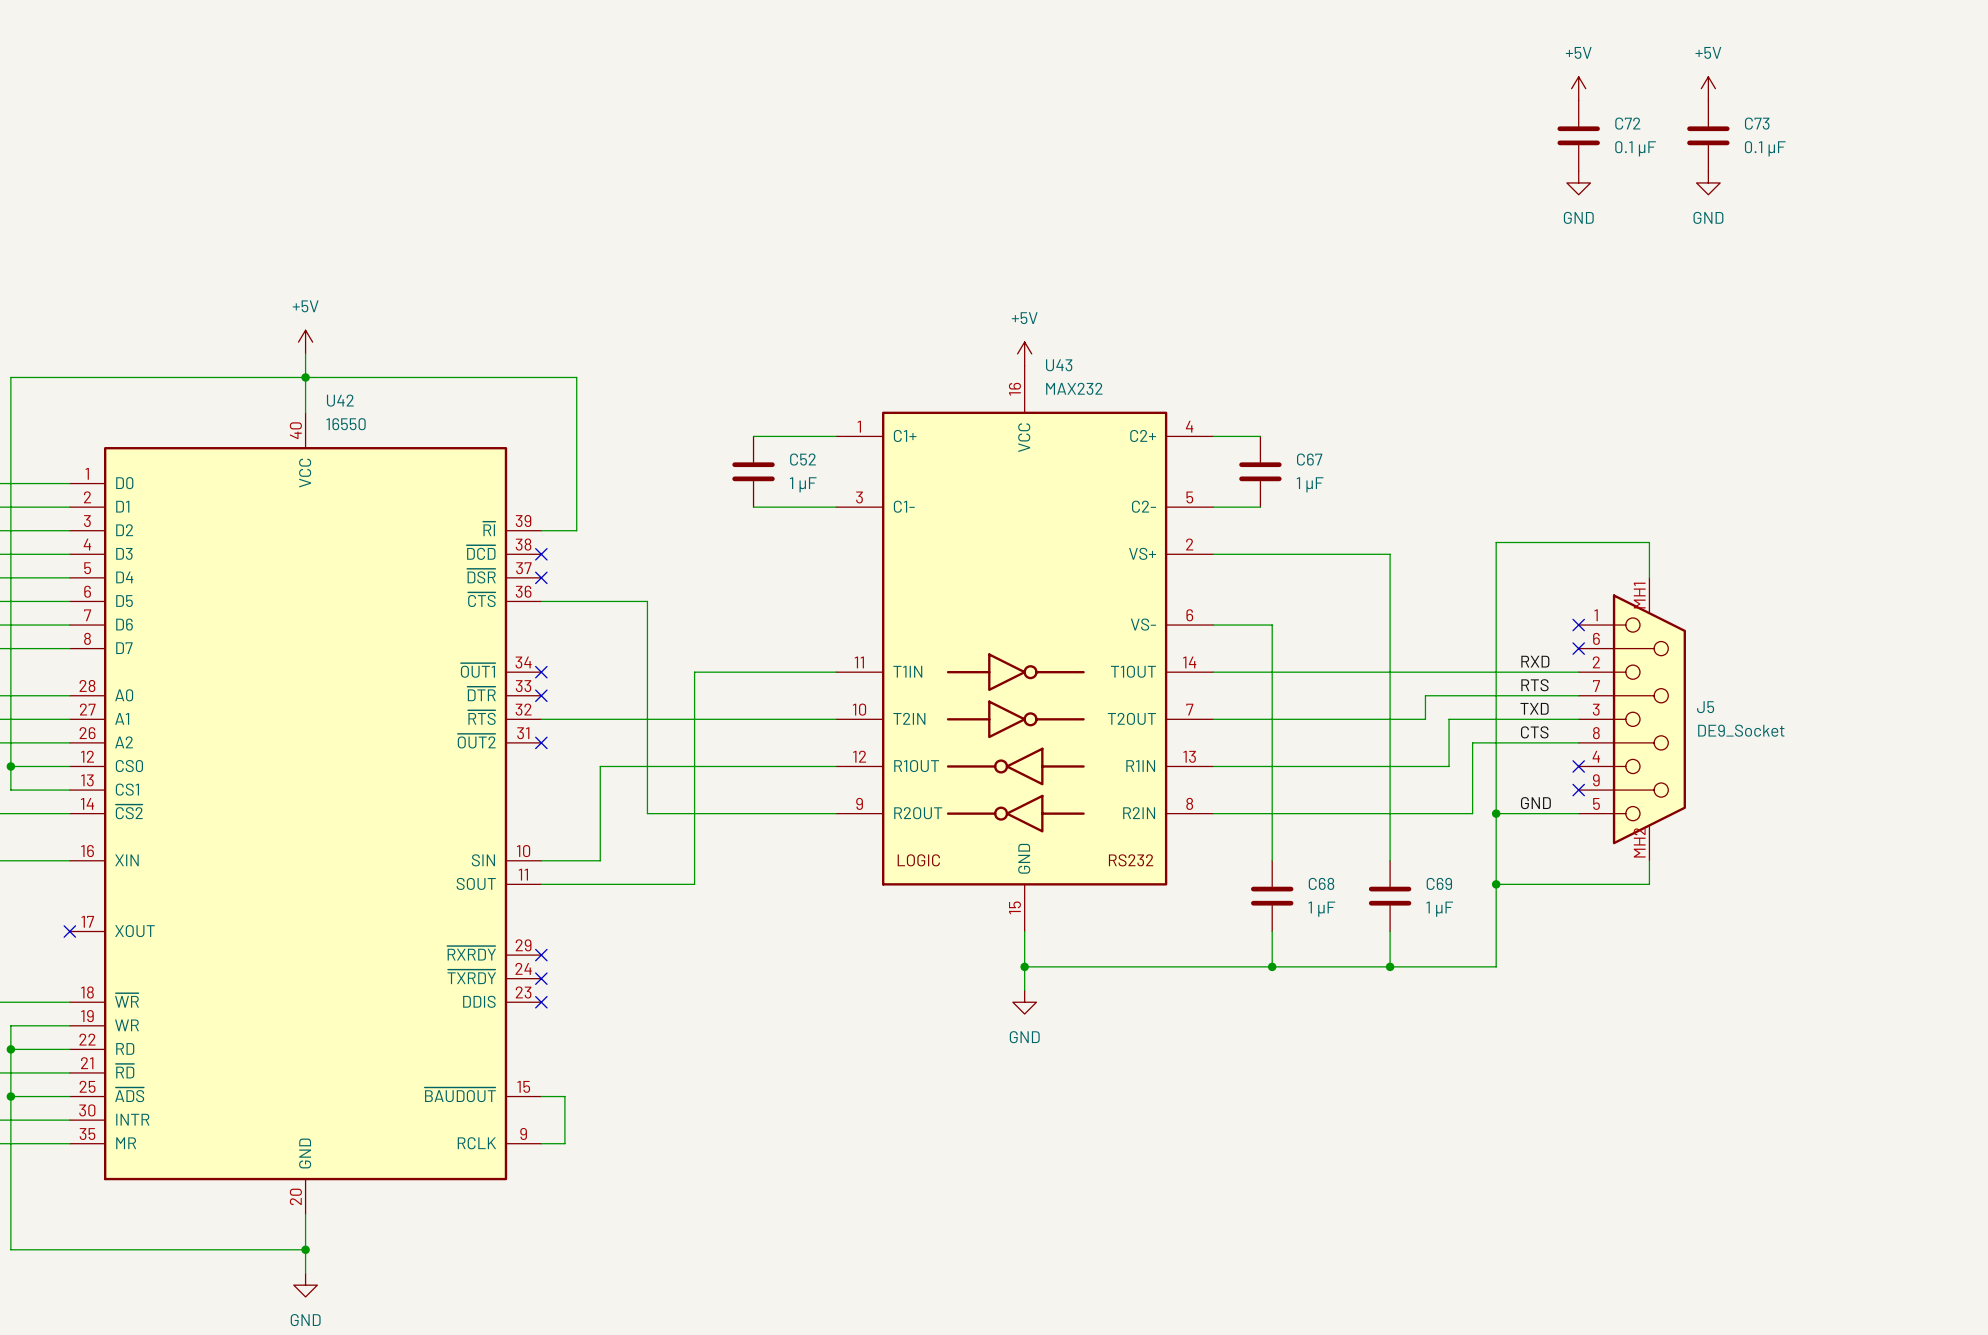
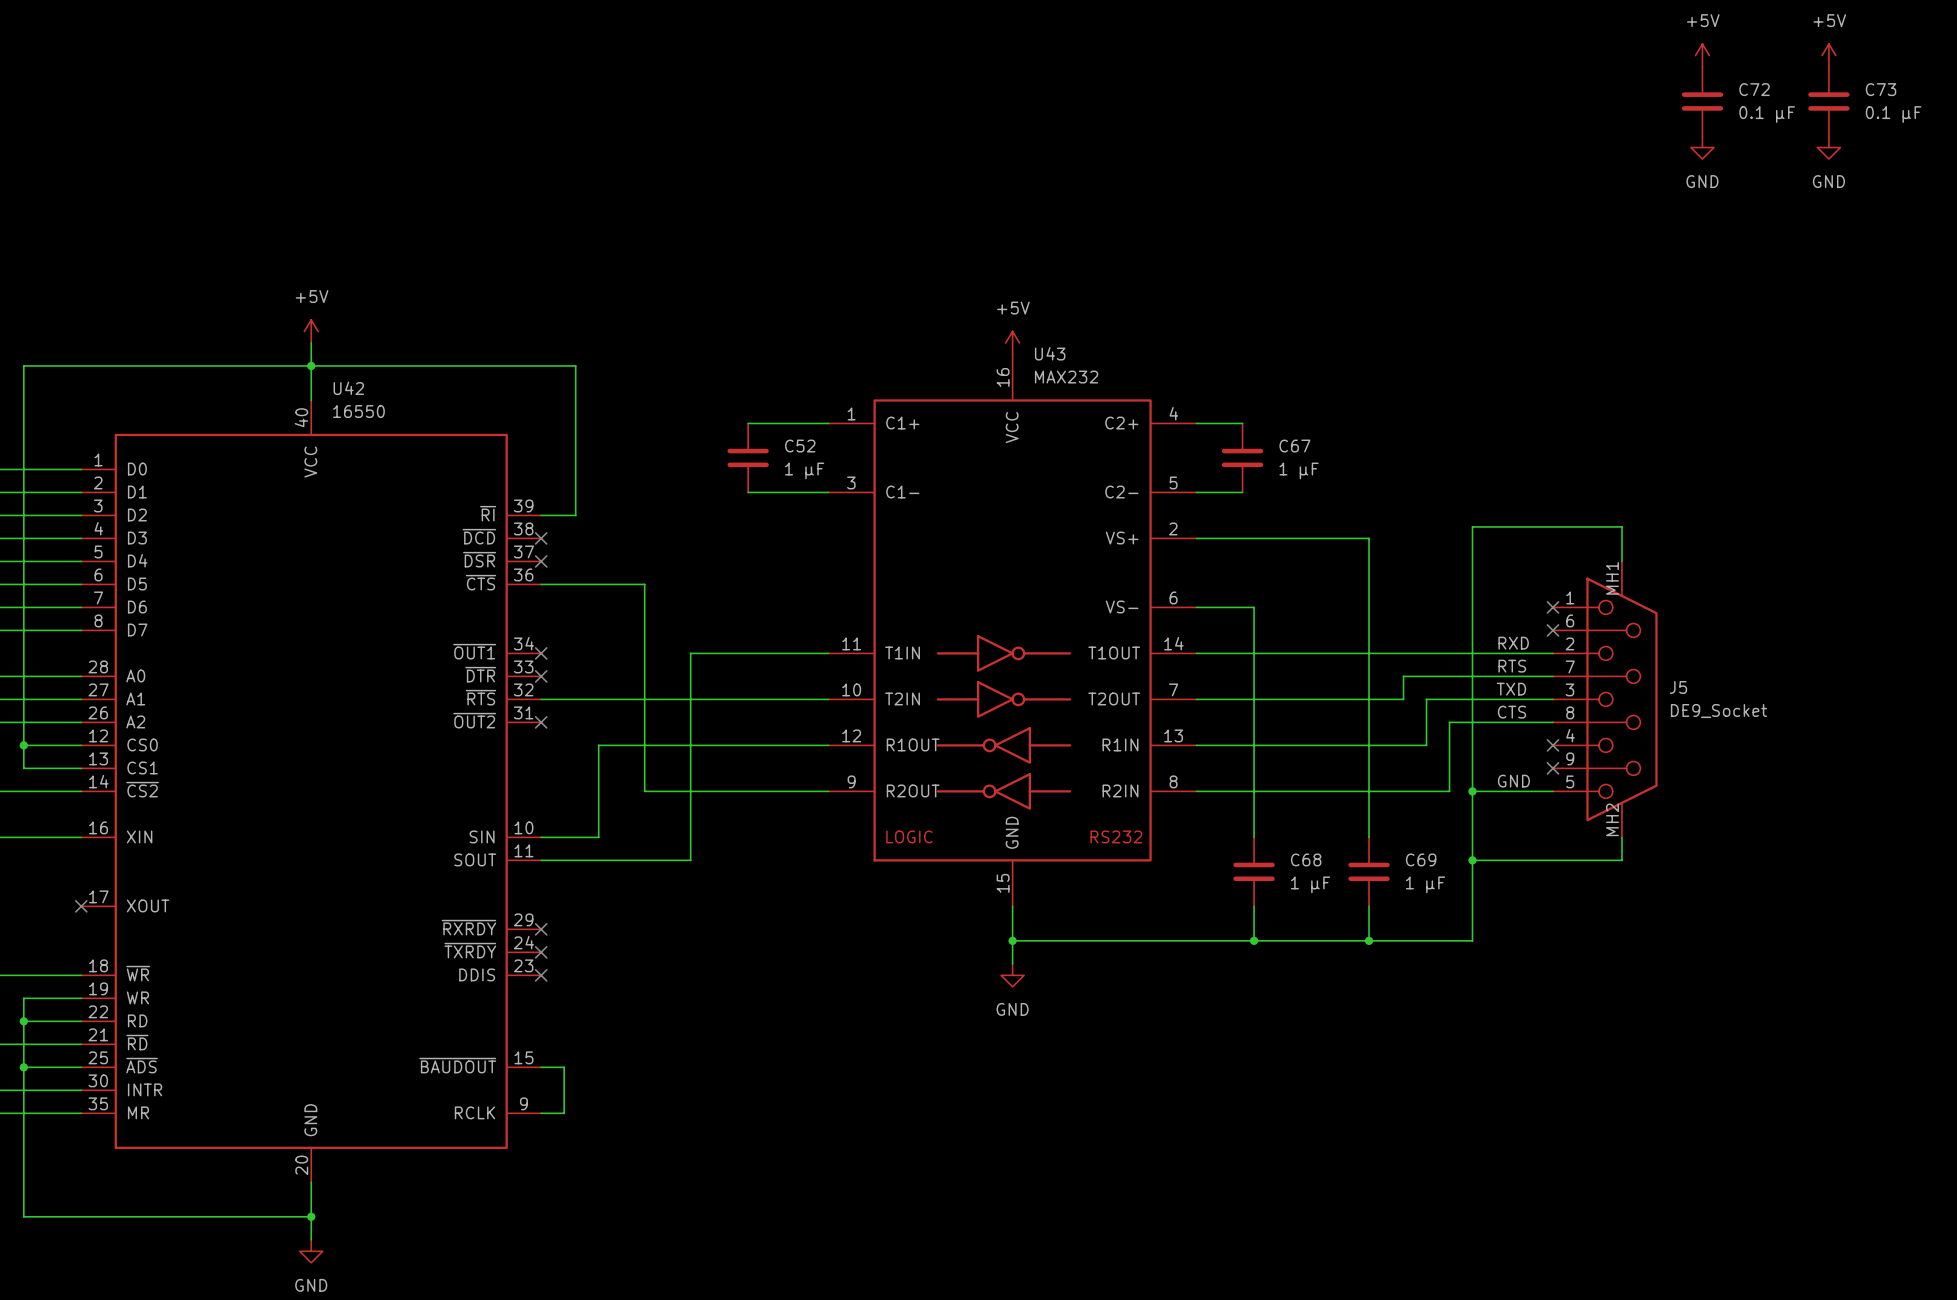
power symbol: none -> +5V (1828, 55)
power symbol: +5V (1578, 88) -> none
power symbol position: +5V (1708, 88) -> +5V (1702, 55)
C72 position: (1578, 135) -> (1702, 101)
C73 position: (1708, 135) -> (1828, 101)
power symbol: none -> GND (1828, 147)
power symbol: GND (1578, 182) -> none
power symbol position: GND (1708, 182) -> GND (1702, 147)

